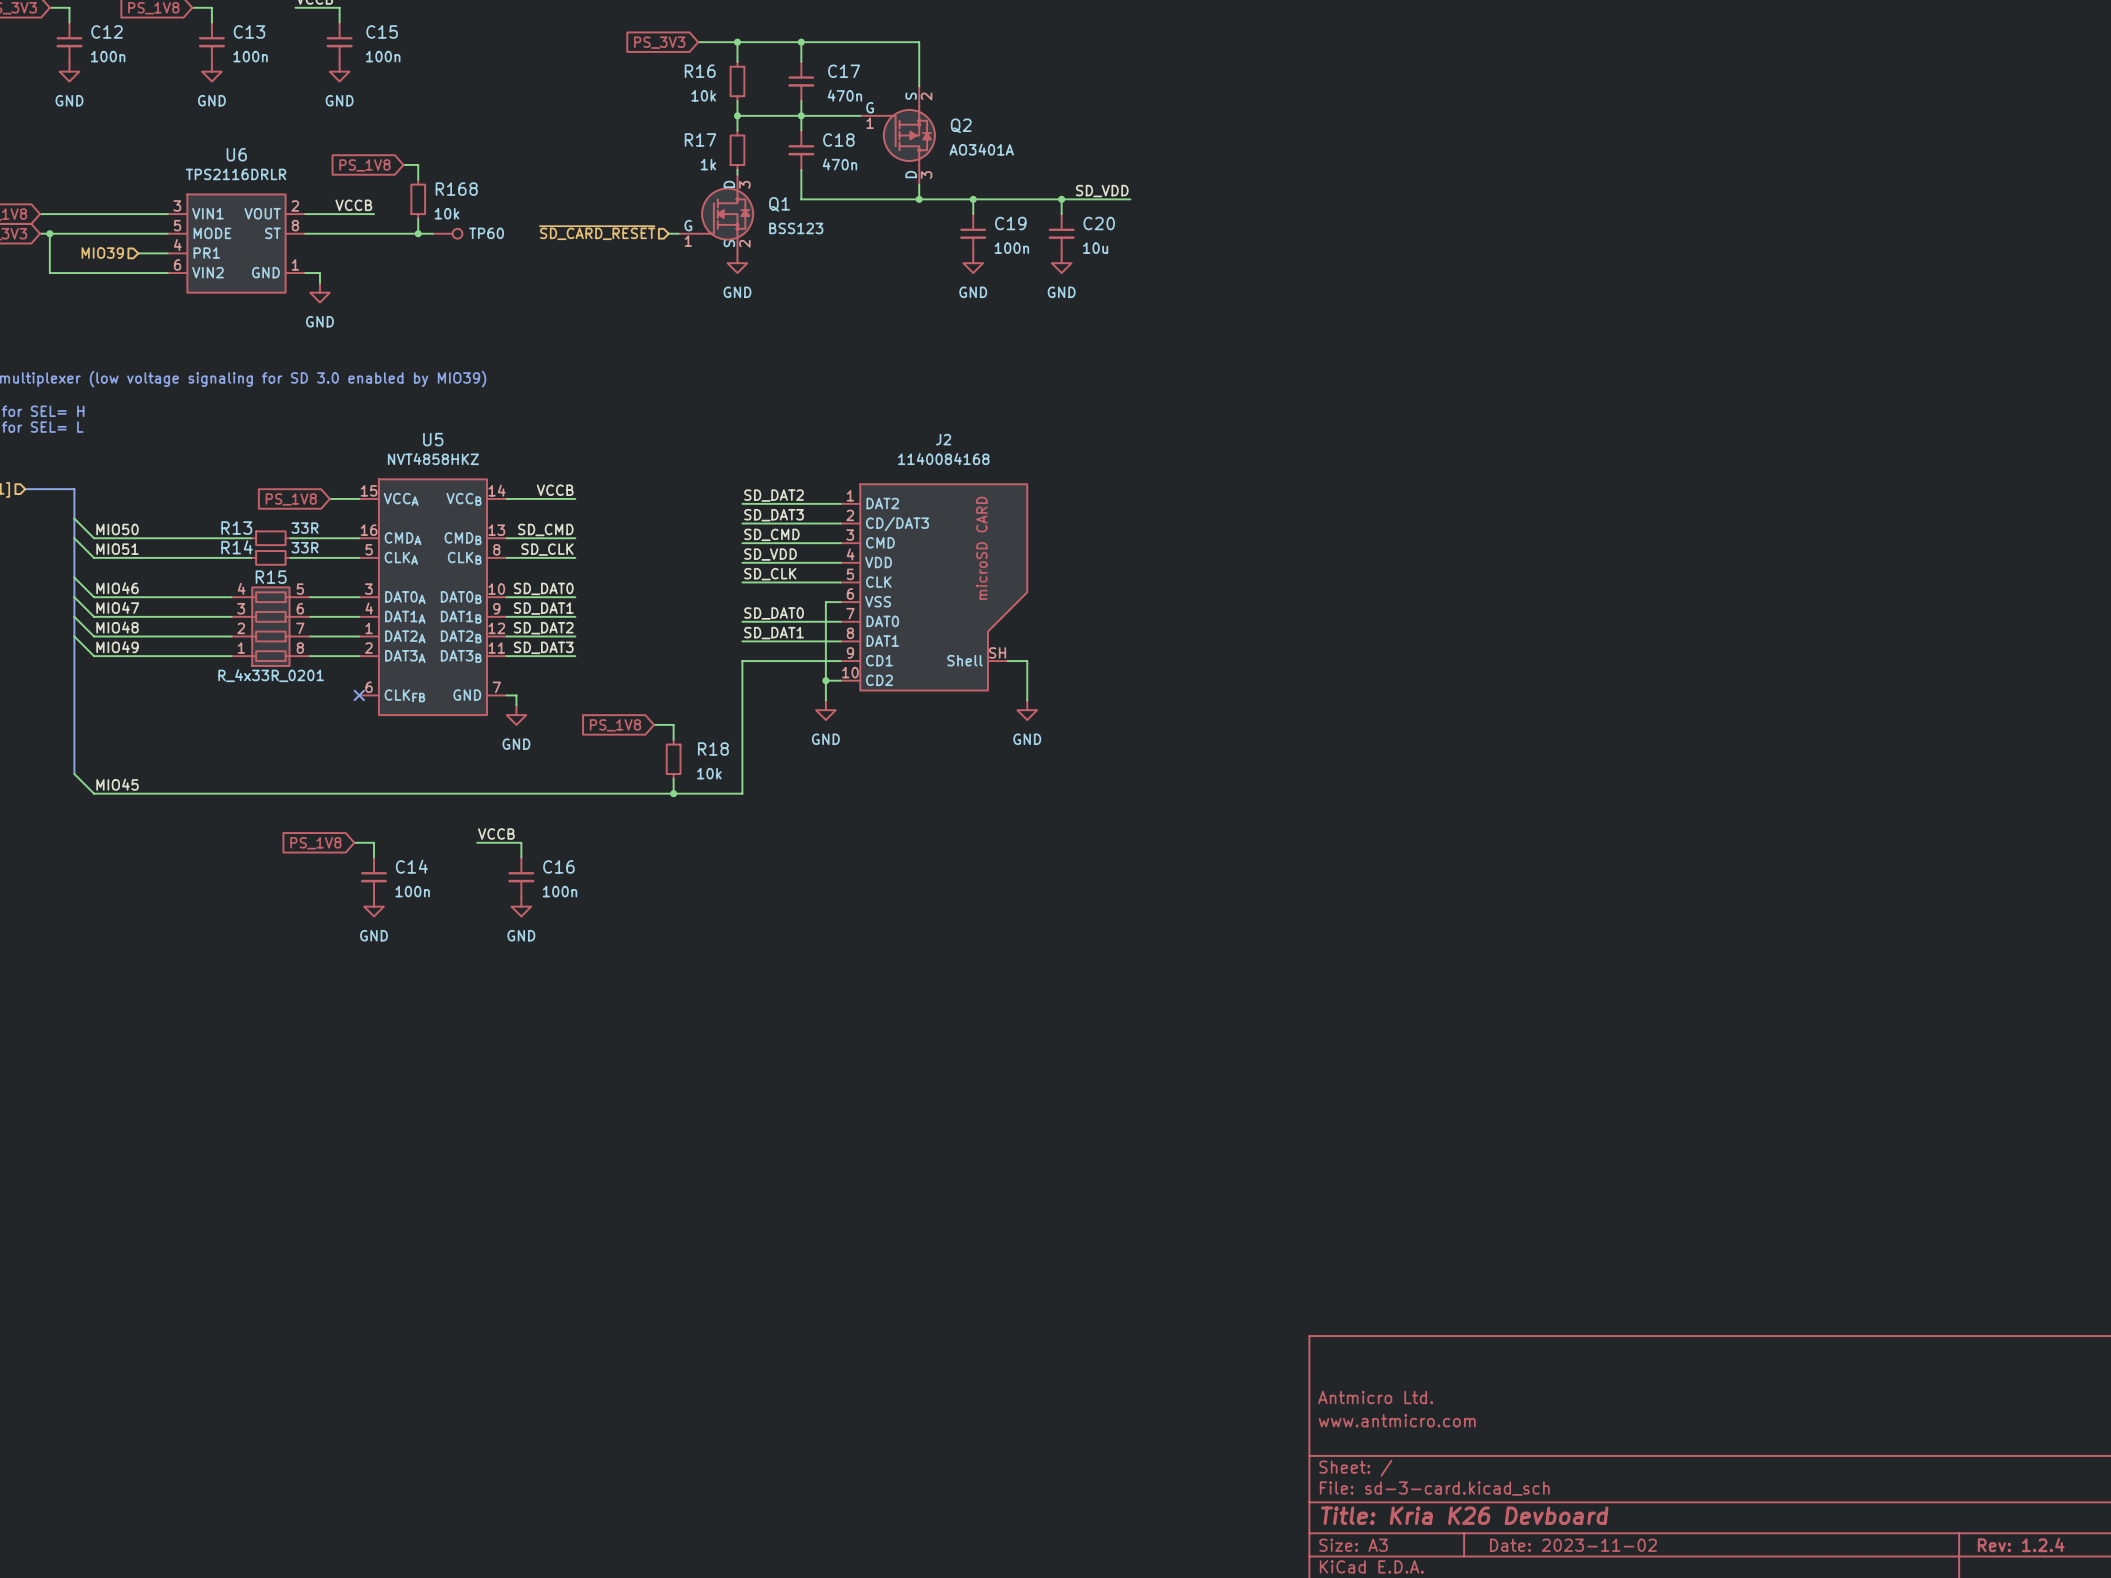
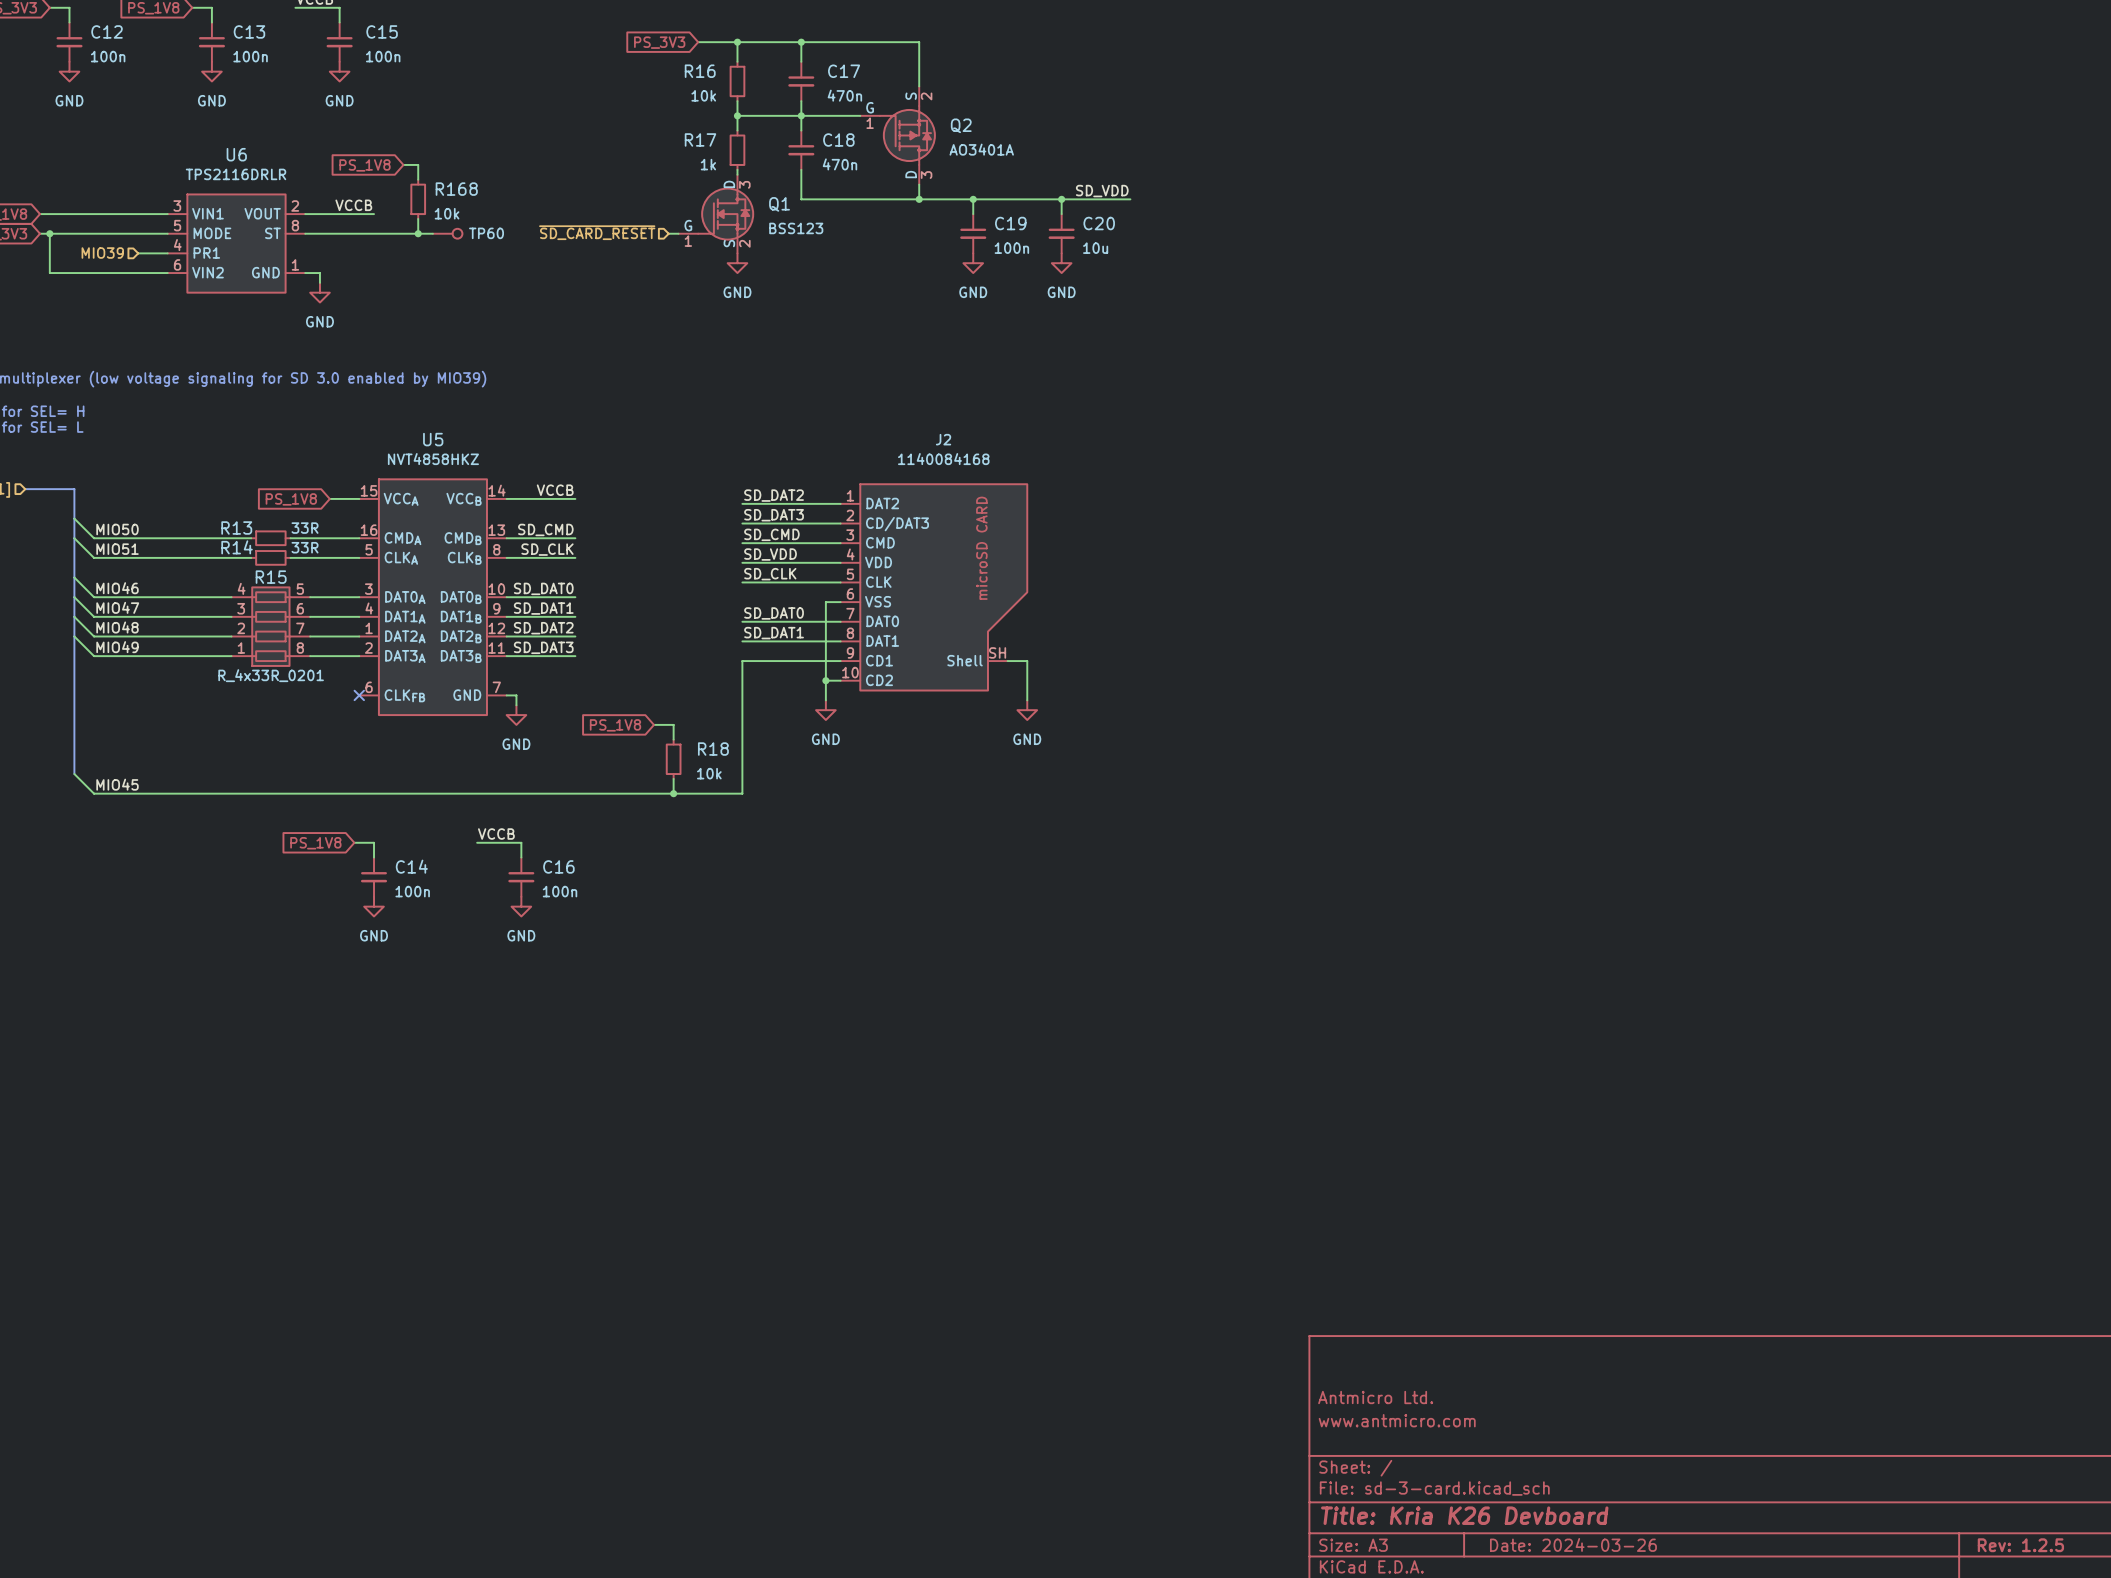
title block: Rev: 1.2.4 (2021, 1544) -> Rev: 1.2.5 (2020, 1545)
title block: Date: 2023-11-02 (1573, 1545) -> Date: 2024-03-26 (1573, 1544)

